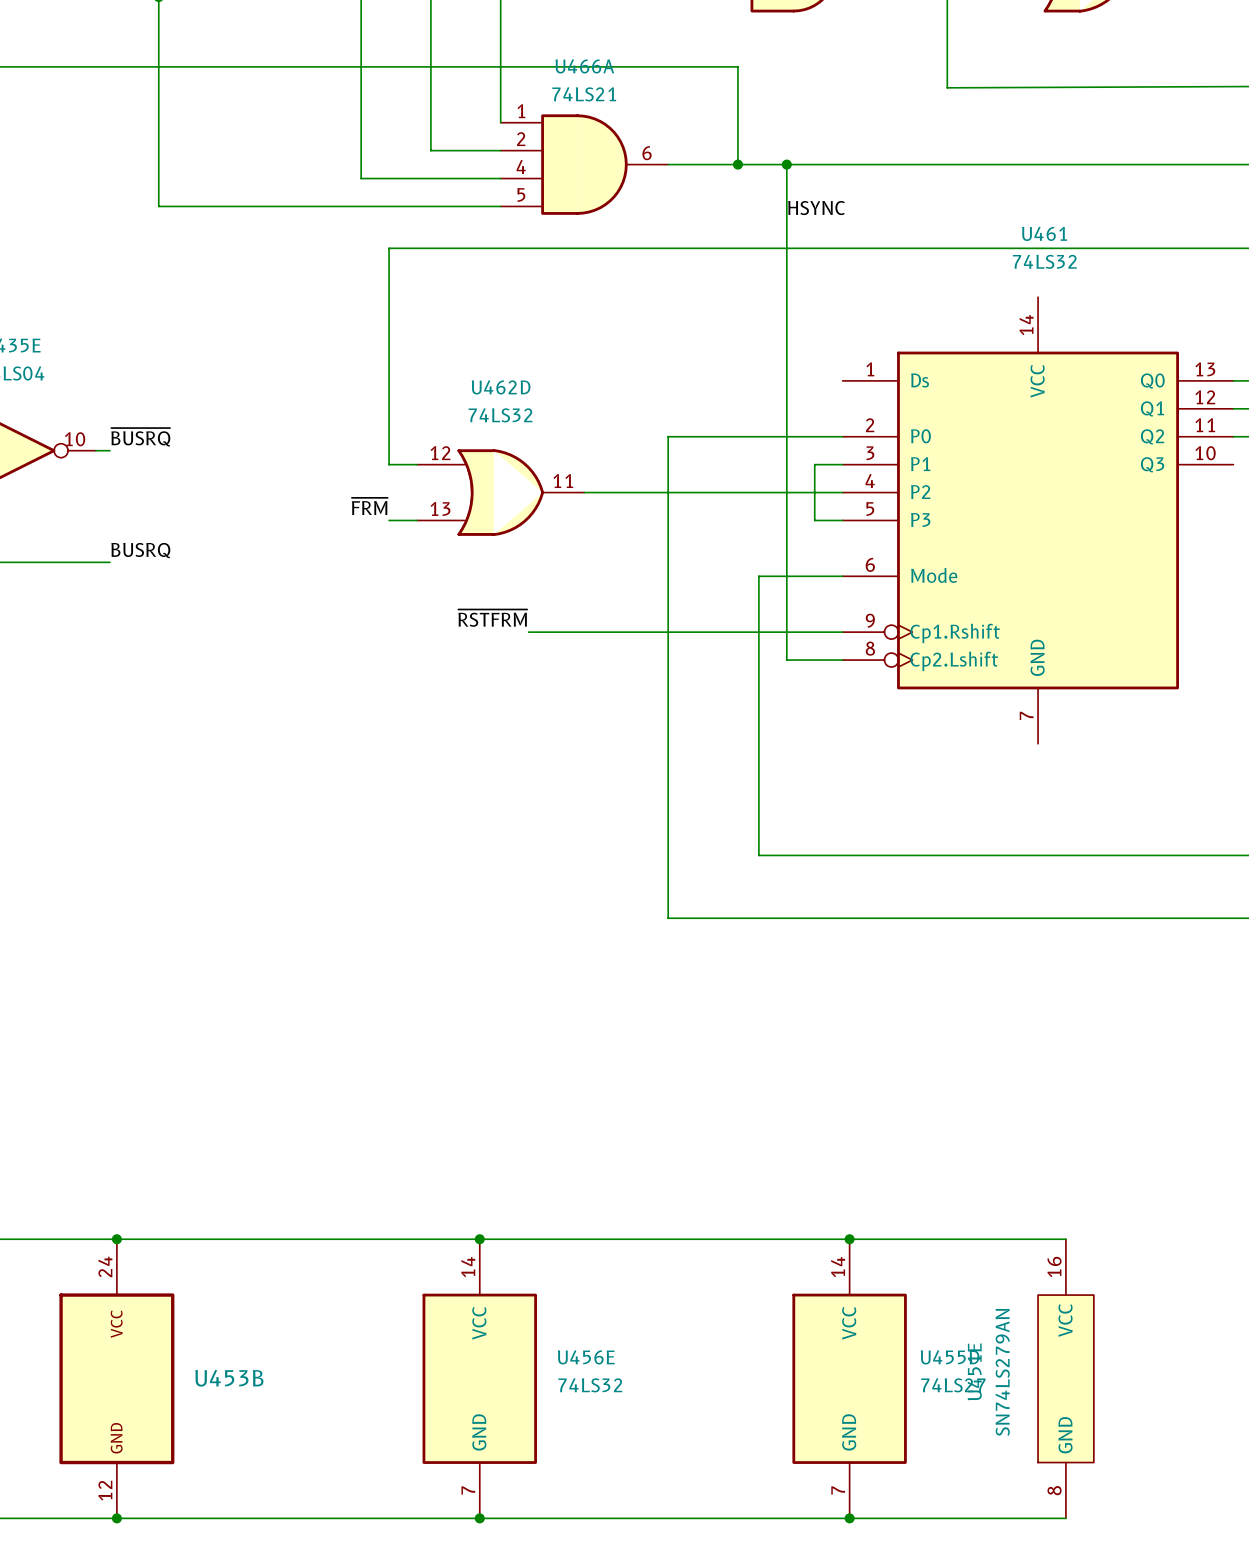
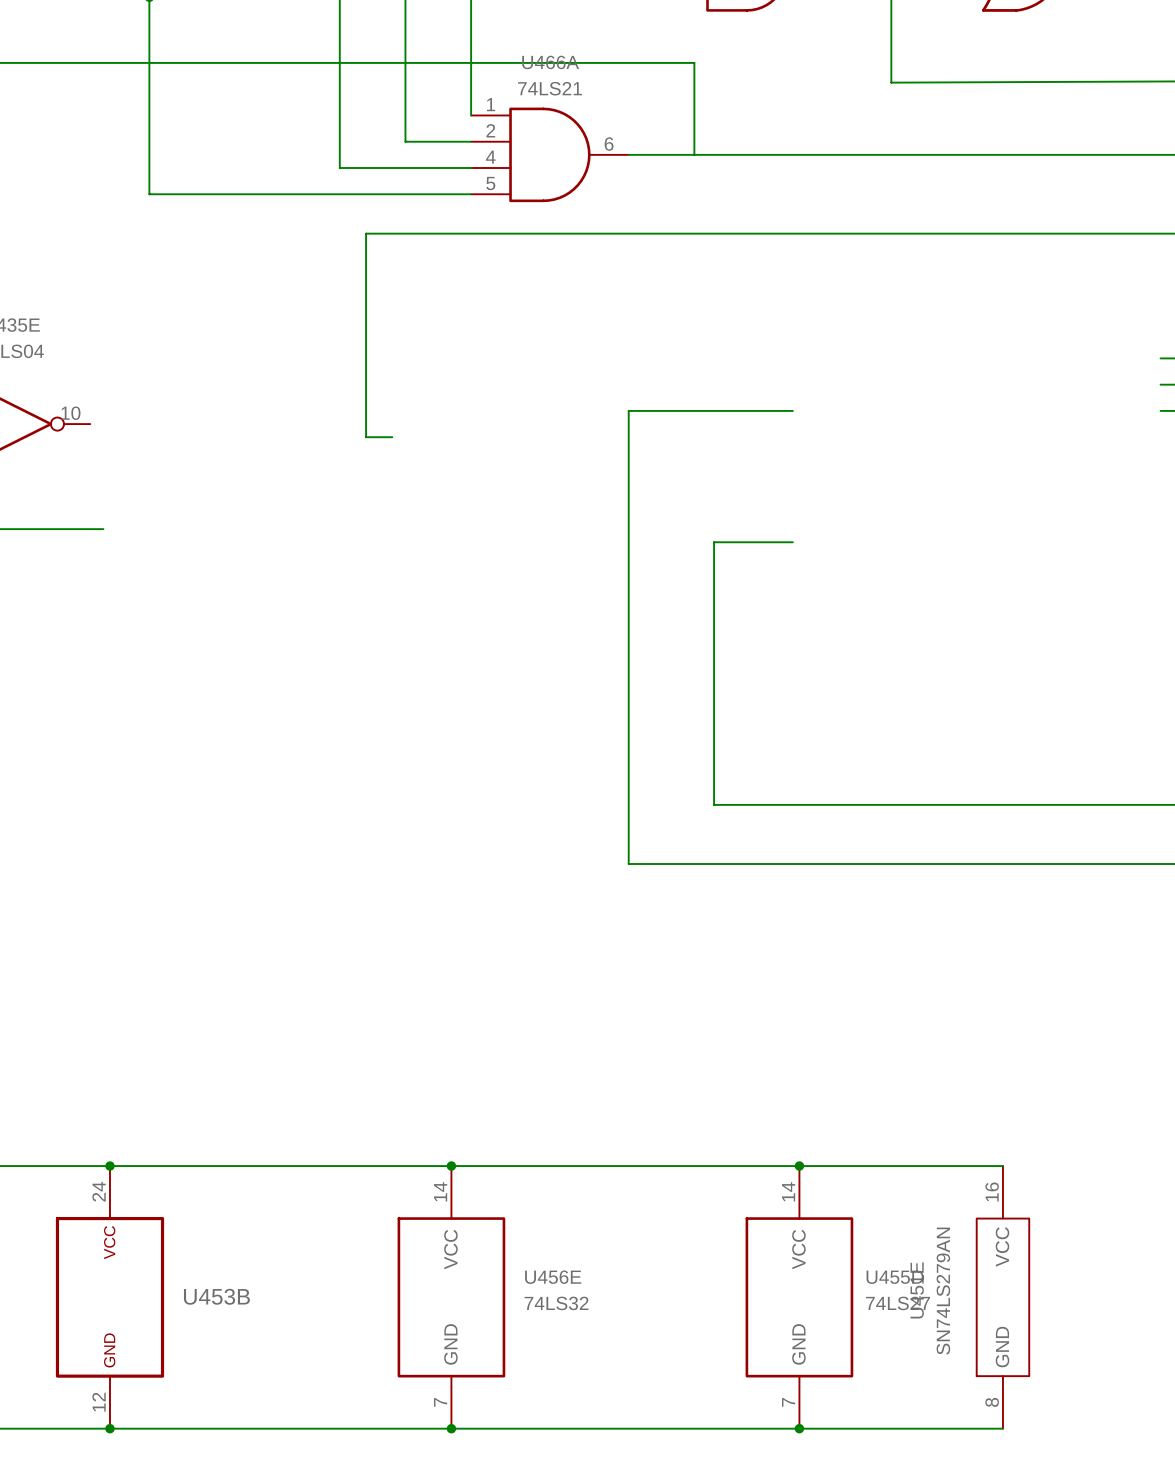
junction: (737, 164) -> none
wire: (786, 164) (786, 660) (842, 660) -> none
junction: (786, 164) -> none
label: HSYNC (816, 208) -> none
label: ~{BUSRQ} (140, 437) -> none
wire: (95, 450) (109, 450) -> none
wire: (842, 464) (814, 464) (814, 520) (842, 520) -> none
U462D: 74LS32 (500, 492) -> none
wire: (584, 492) (842, 492) -> none
label: ~{FRM} (369, 506) -> none
wire: (389, 520) (416, 520) -> none
U461: 74LS32 (1038, 520) -> none
label: BUSRQ (140, 550) -> none
label: ~{RSTFRM} (492, 618) -> none
wire: (528, 632) (842, 632) -> none

